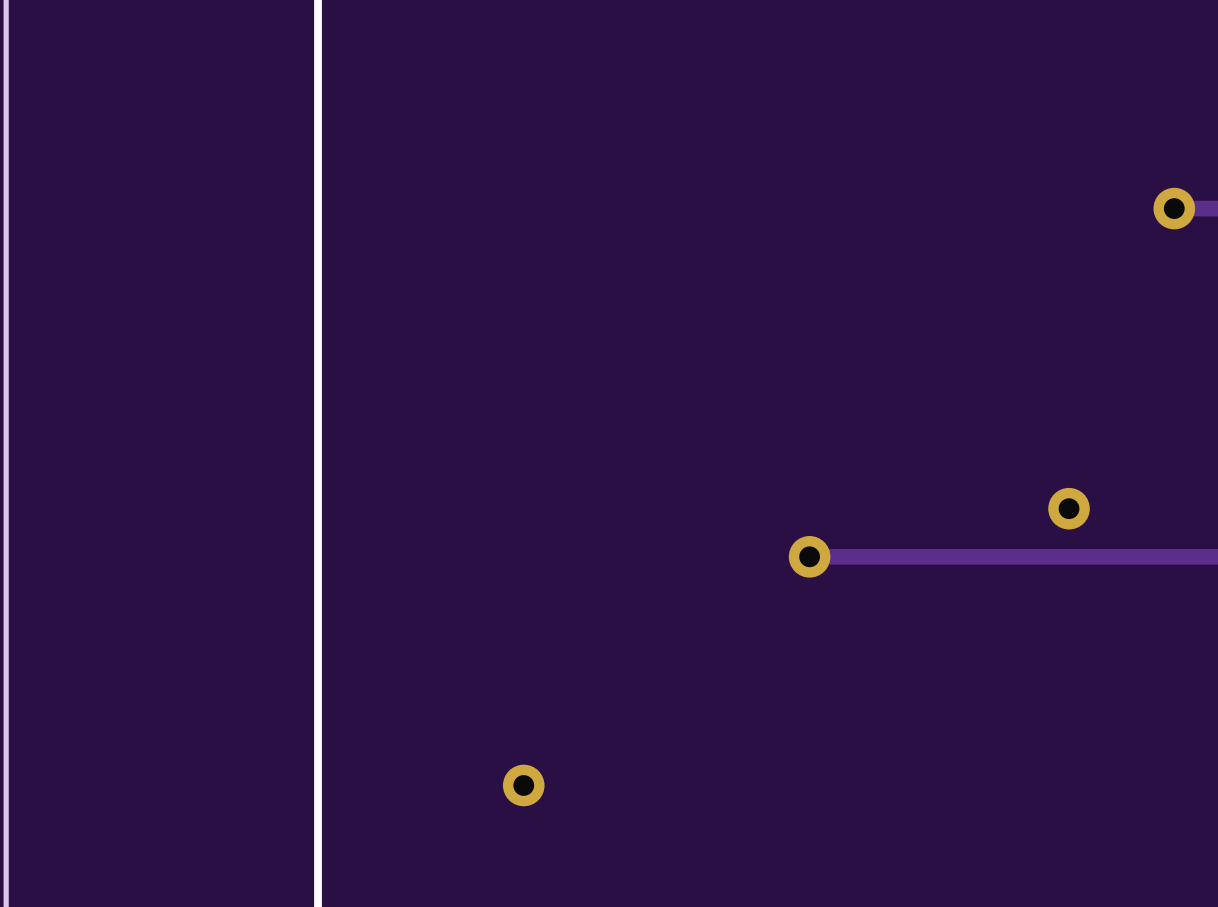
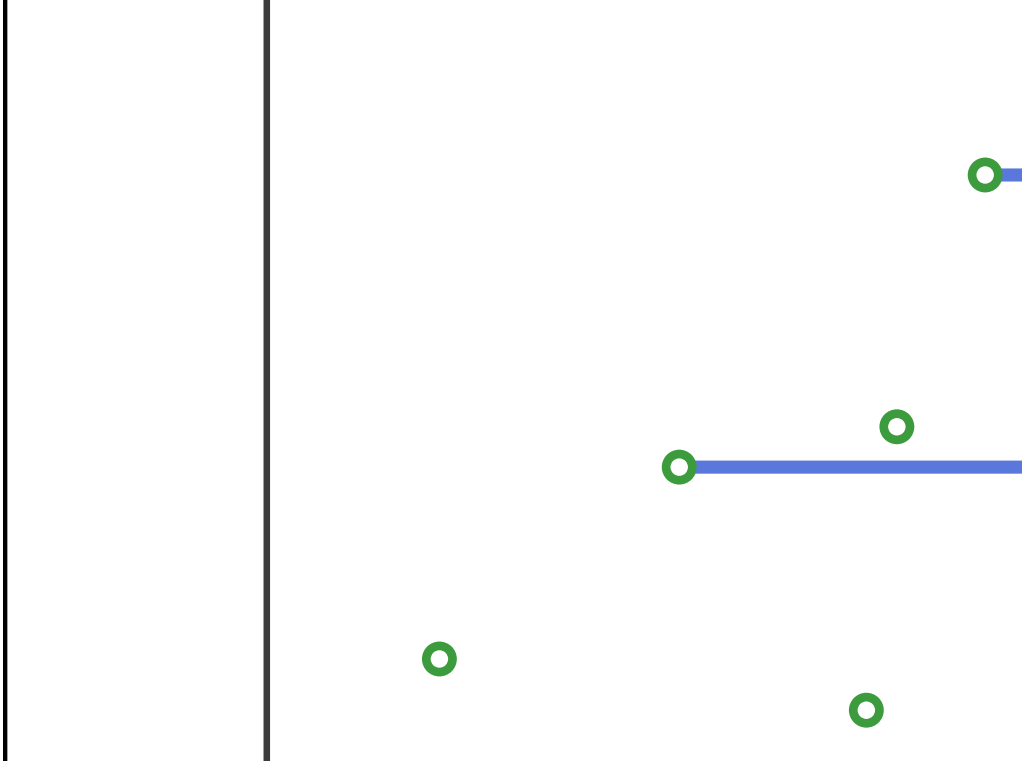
via: none -> (866, 710)

